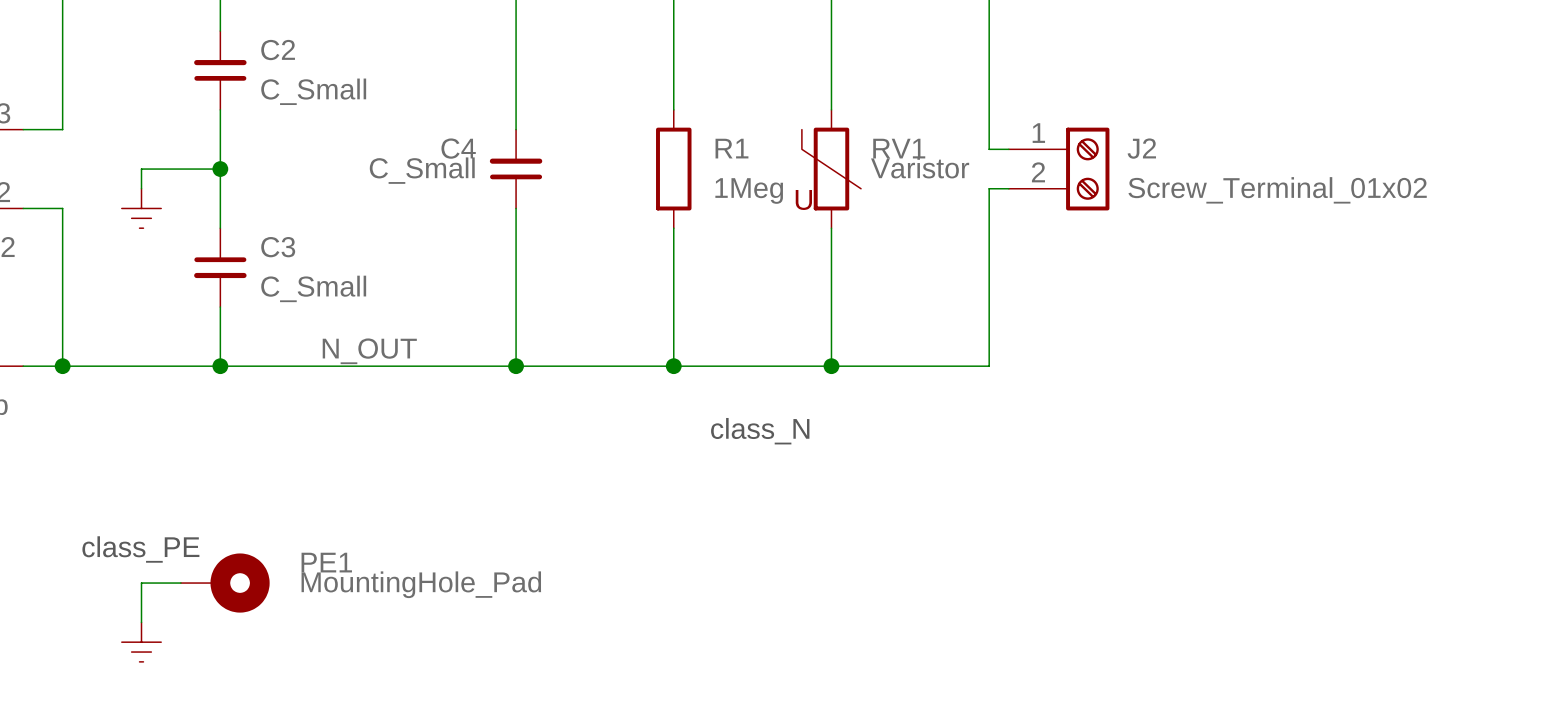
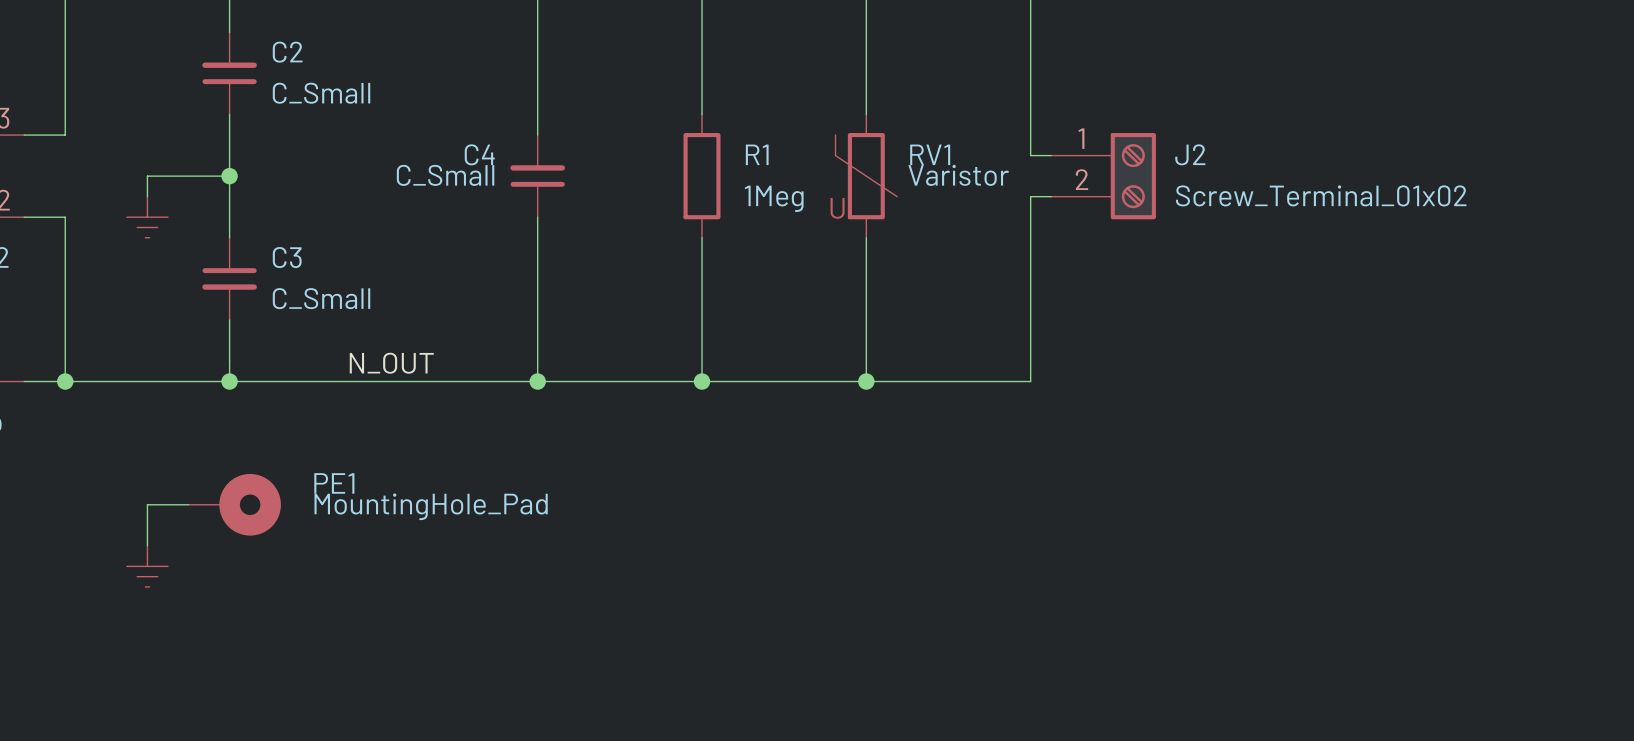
text: class_N (760, 431) -> none
text: class_PE (140, 549) -> none
wire: (180, 583) (141, 583) (141, 622) -> (188, 504) (147, 504) (147, 545)
PE1 position: (225, 583) -> (234, 504)
power symbol position: (141, 642) -> (147, 566)

